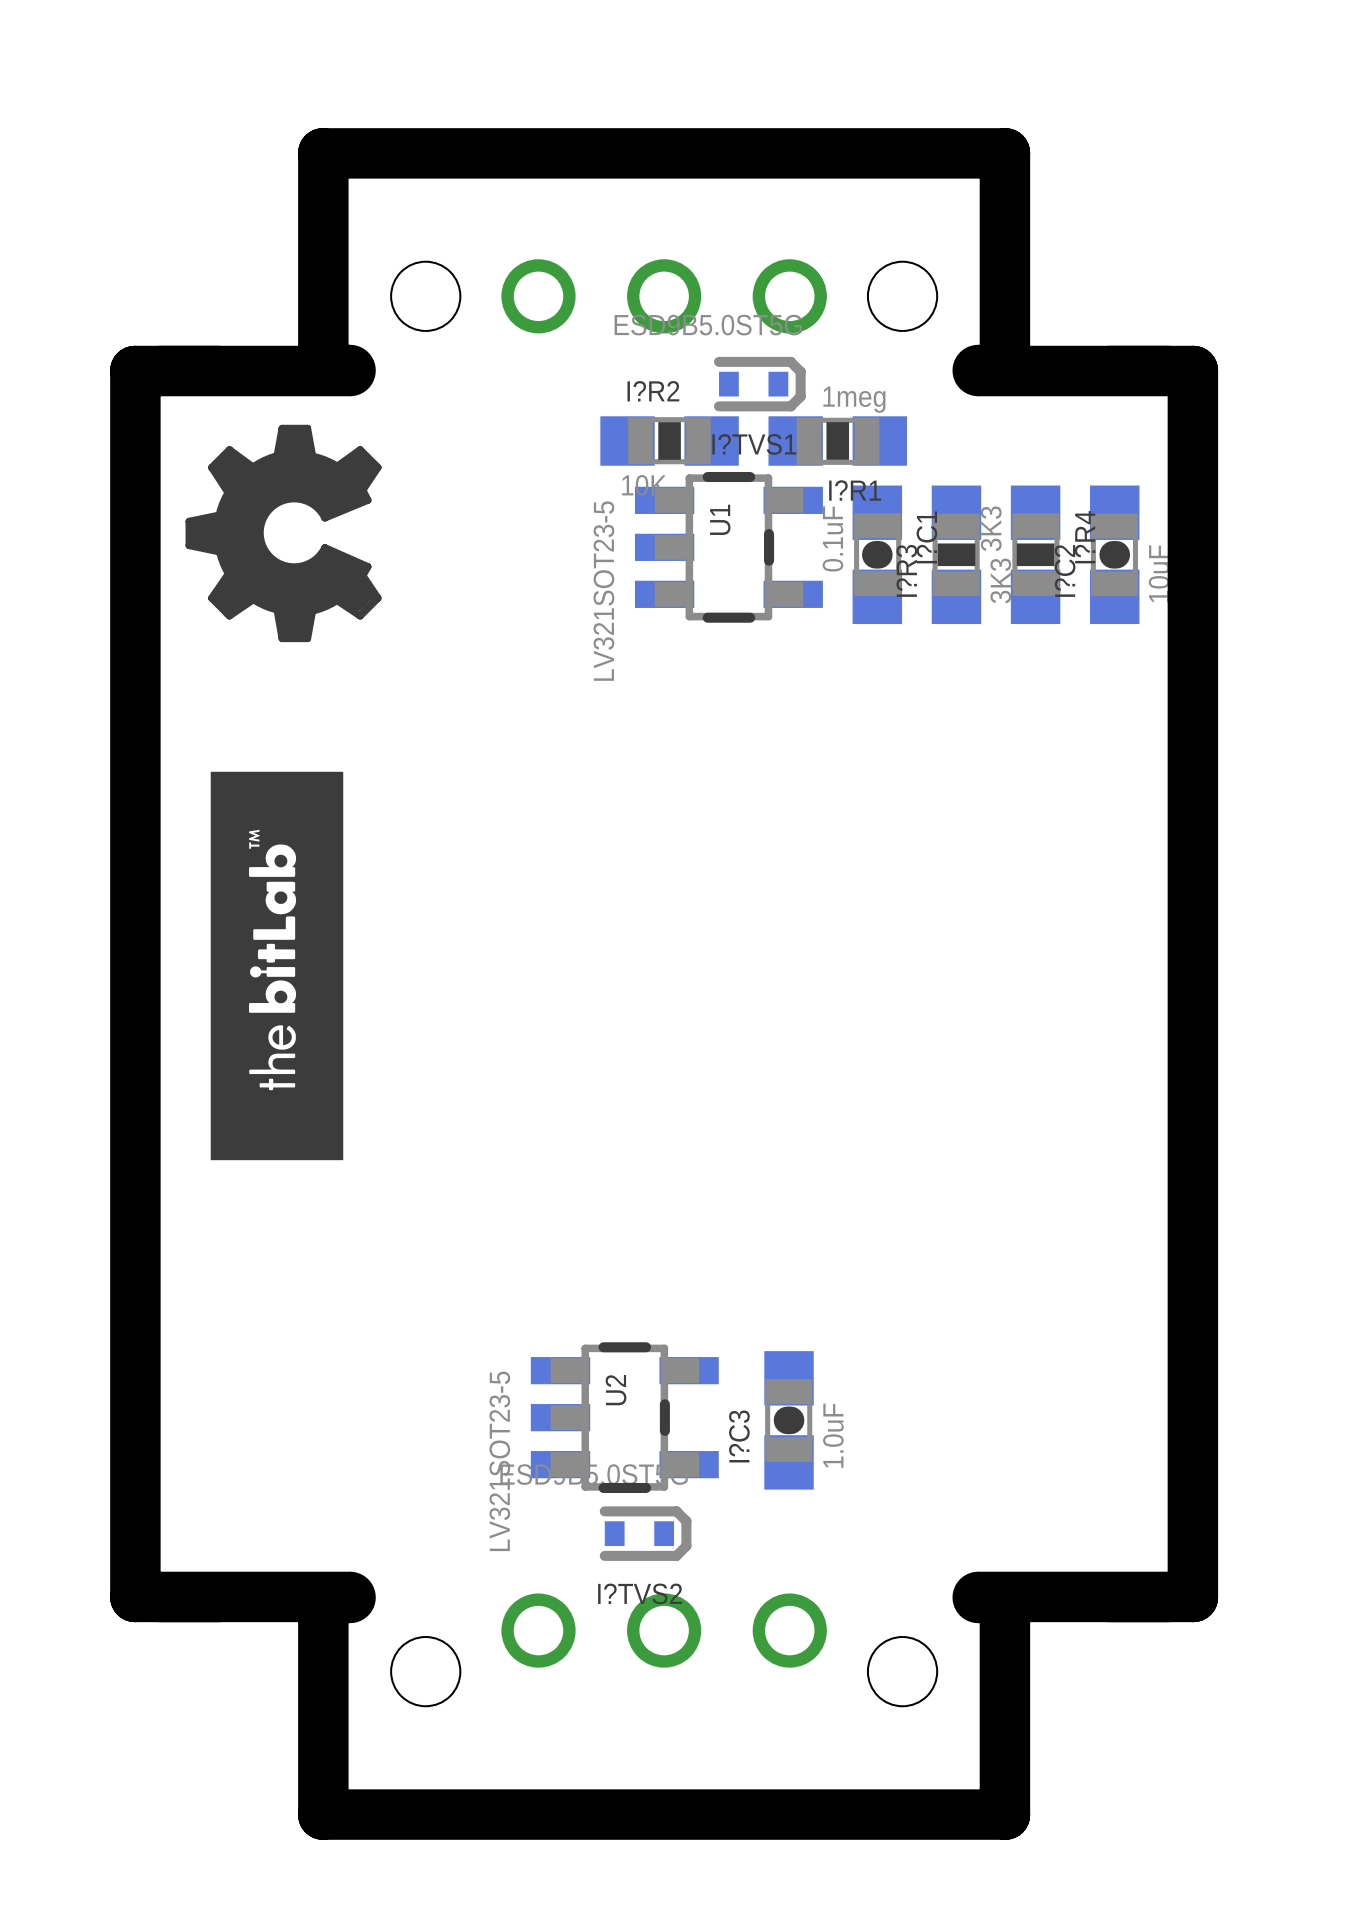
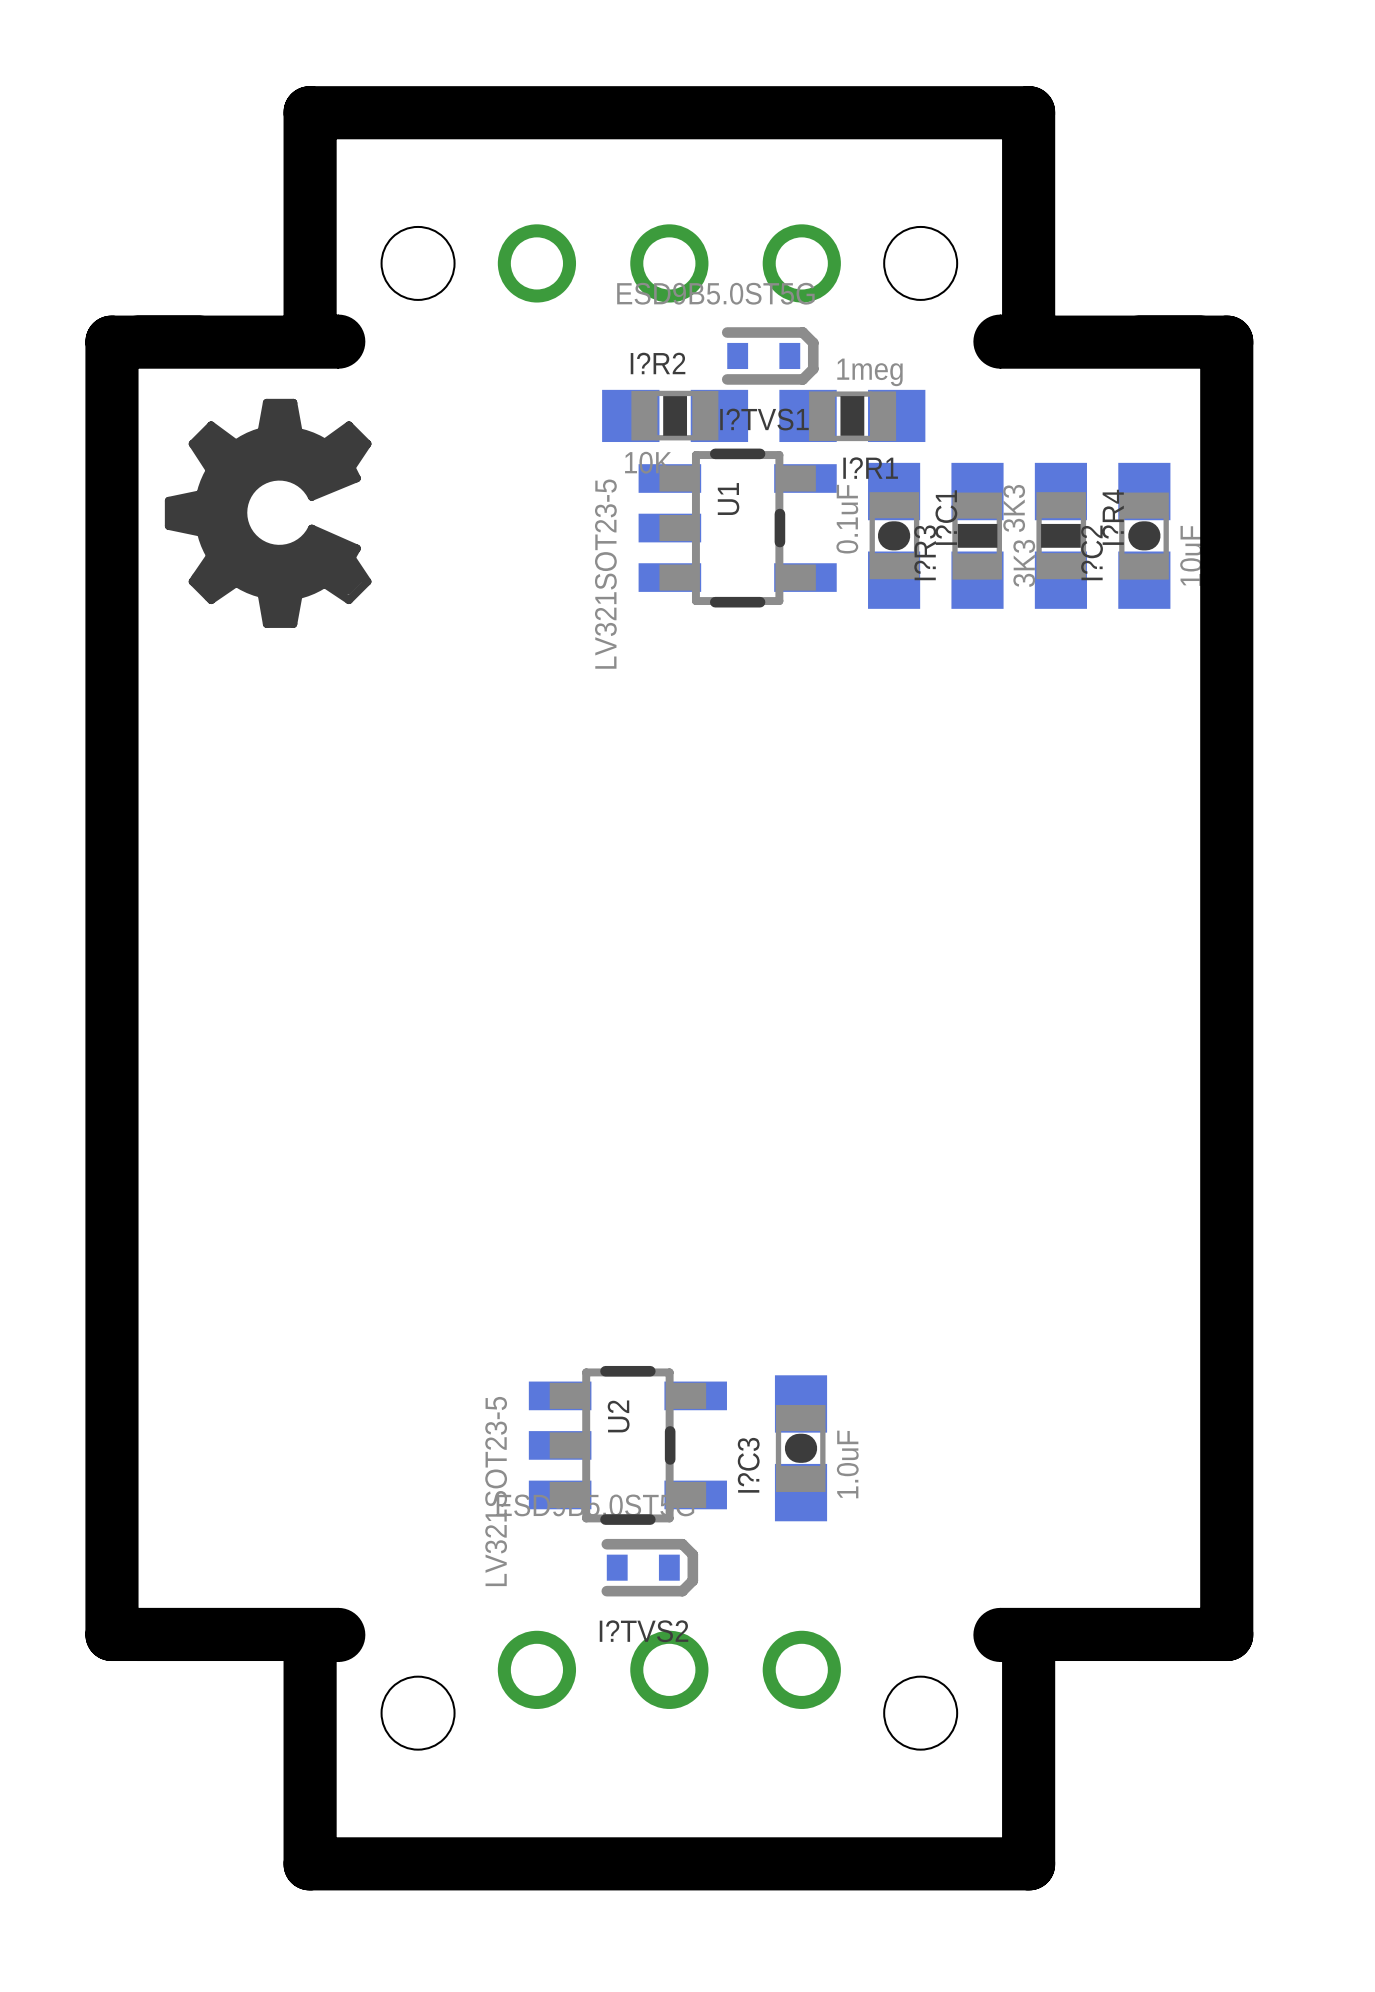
drawing: [210, 771, 344, 1161] -> none

